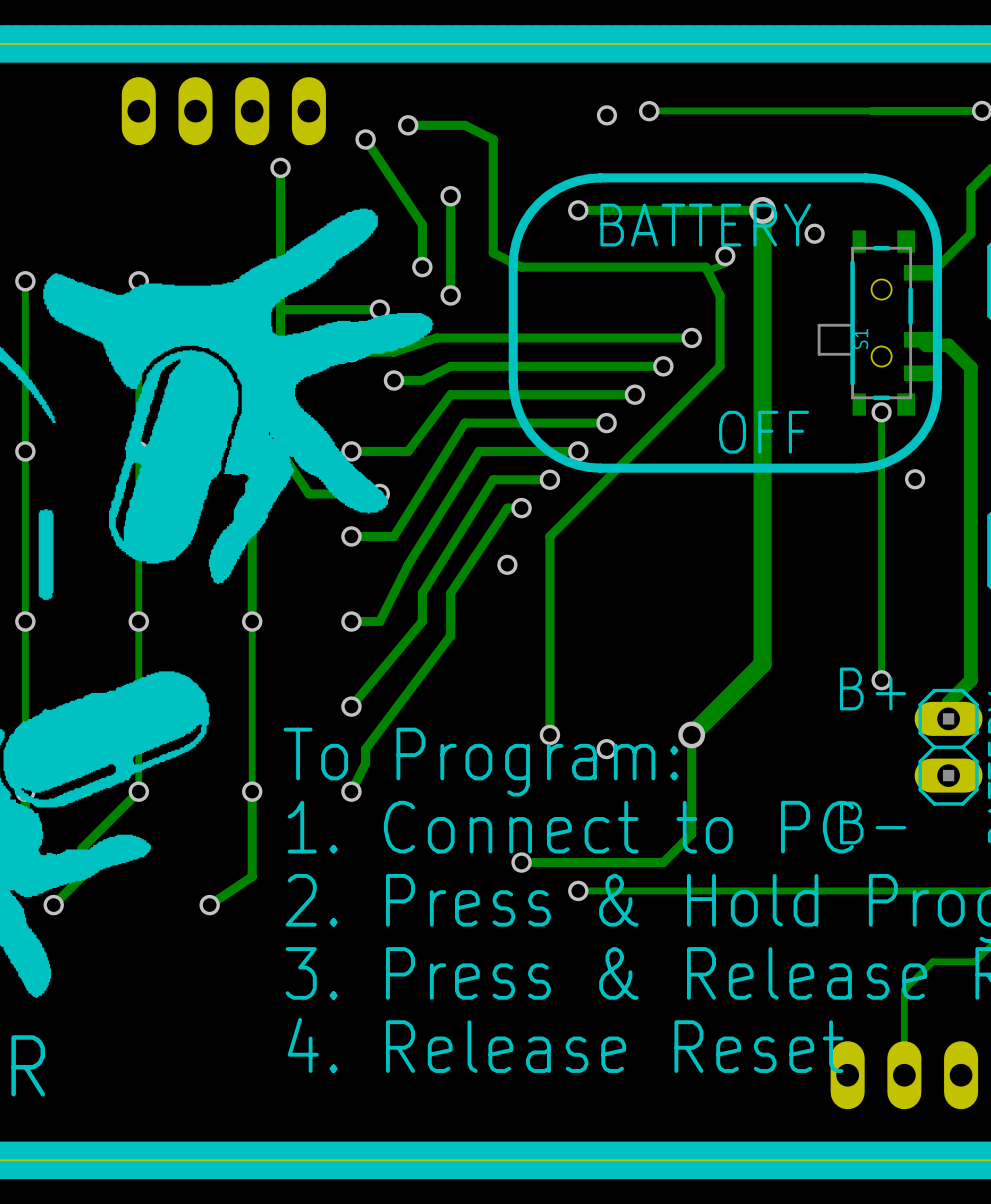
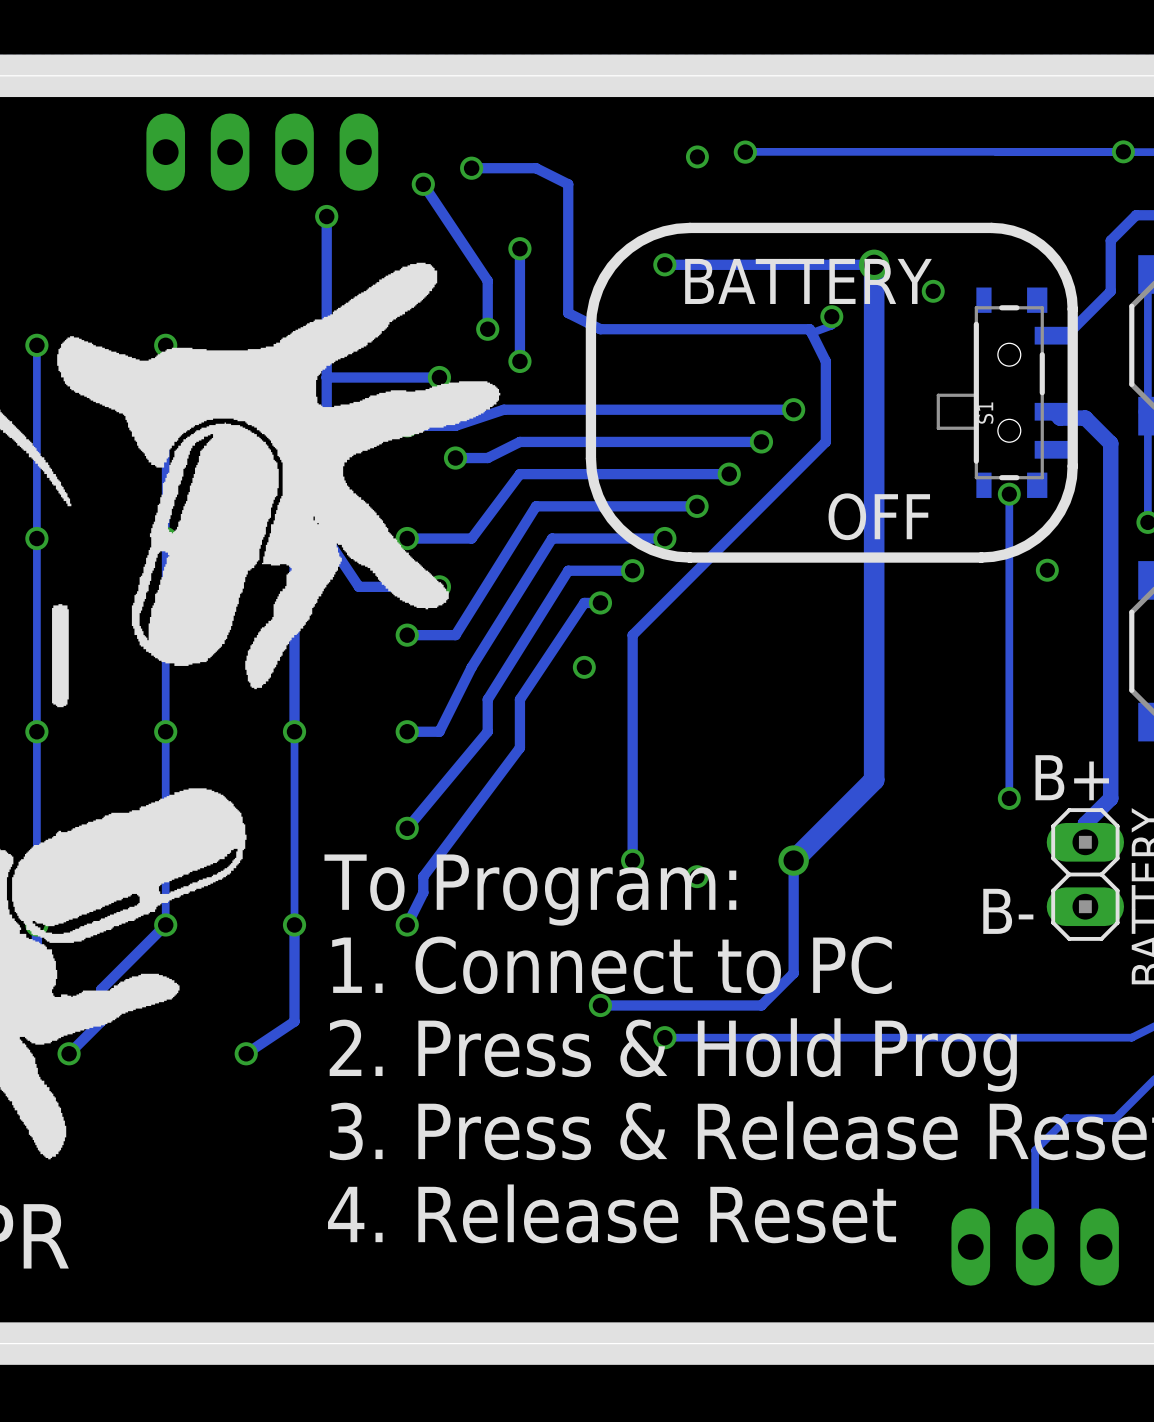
text position: B+ (873, 688) -> B+ (1072, 777)
text position: B- (873, 822) -> B- (1008, 911)

